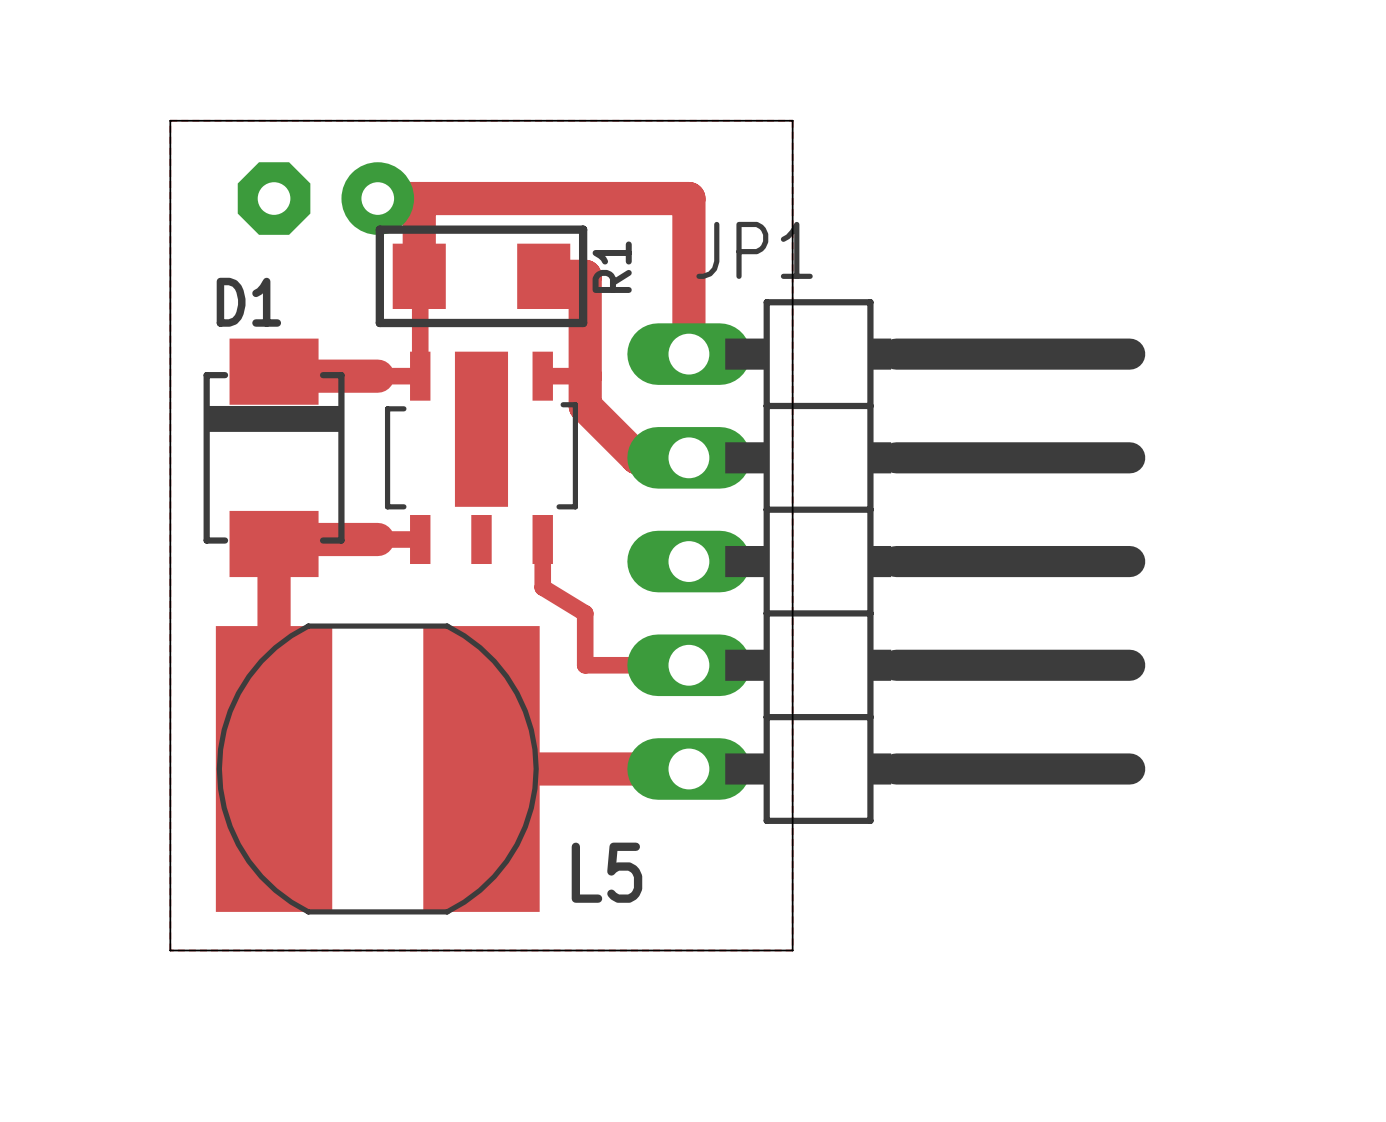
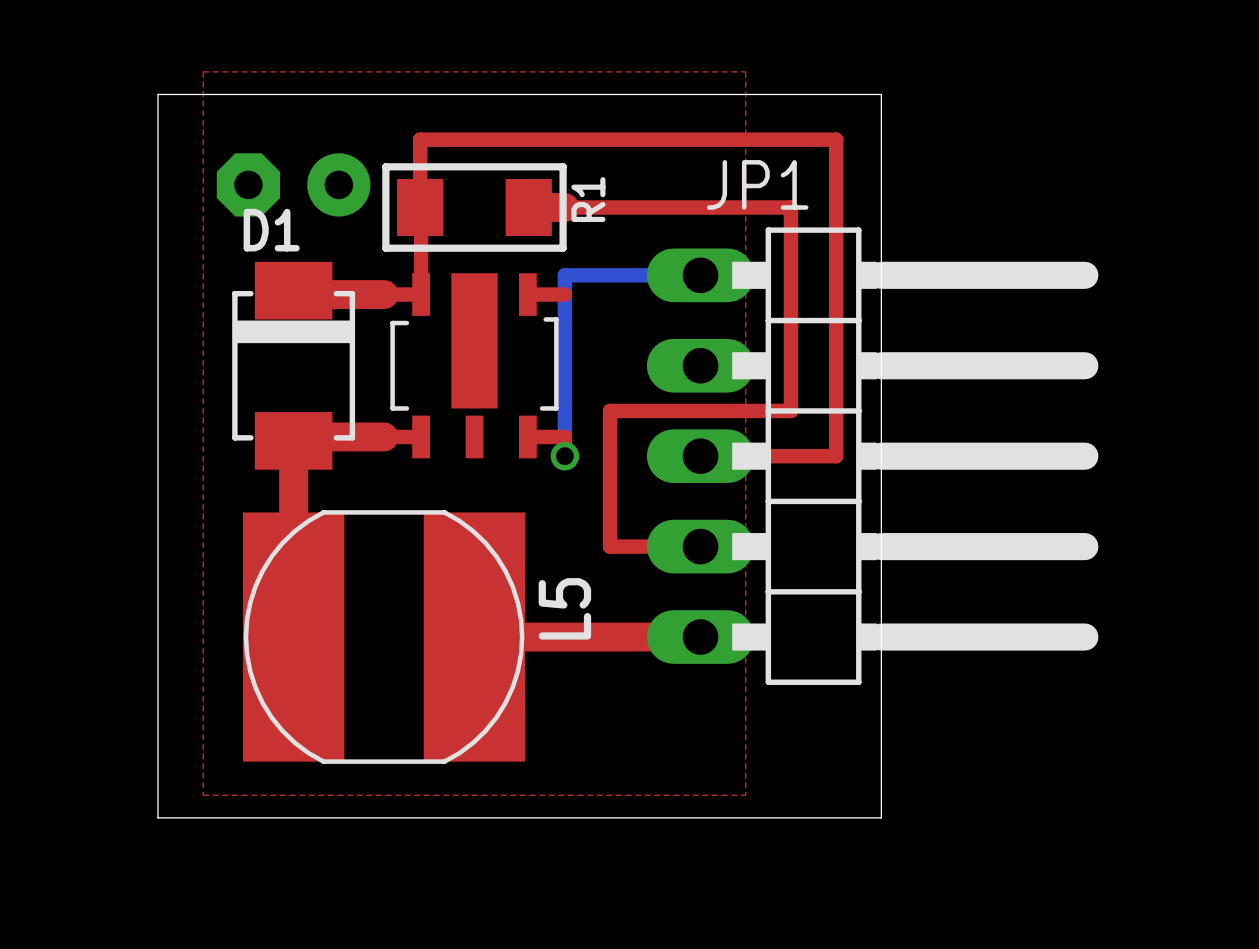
board edge: (170, 120) (792, 120) (792, 950) (170, 950) (170, 120) -> (157, 94) (157, 817) (881, 817) (881, 94) (157, 94)
part position: (325, 198) -> (293, 184)
top track: (688, 198) (688, 354) -> (655, 139) (836, 139) (836, 456) (700, 456)
top track width: thick (688, 198) (419, 198) (419, 276) -> thin (655, 139) (420, 139) (420, 207)
top track: (585, 276) (585, 405) (637, 457) (688, 457) -> (564, 207) (790, 207) (790, 410) (610, 410) (610, 546)
bottom track: none -> (700, 275) (564, 275) (564, 456)
top track: (542, 539) (542, 587) (585, 613) (585, 665) (637, 665) -> (527, 436) (564, 436) (564, 456)
via: none -> (564, 456)
JP1 position: (886, 561) -> (872, 456)
L5 name rotation: 0° (606, 872) -> 90° counterclockwise (564, 608)
L5 name position: L5 (606, 872) -> L5 (564, 608)

